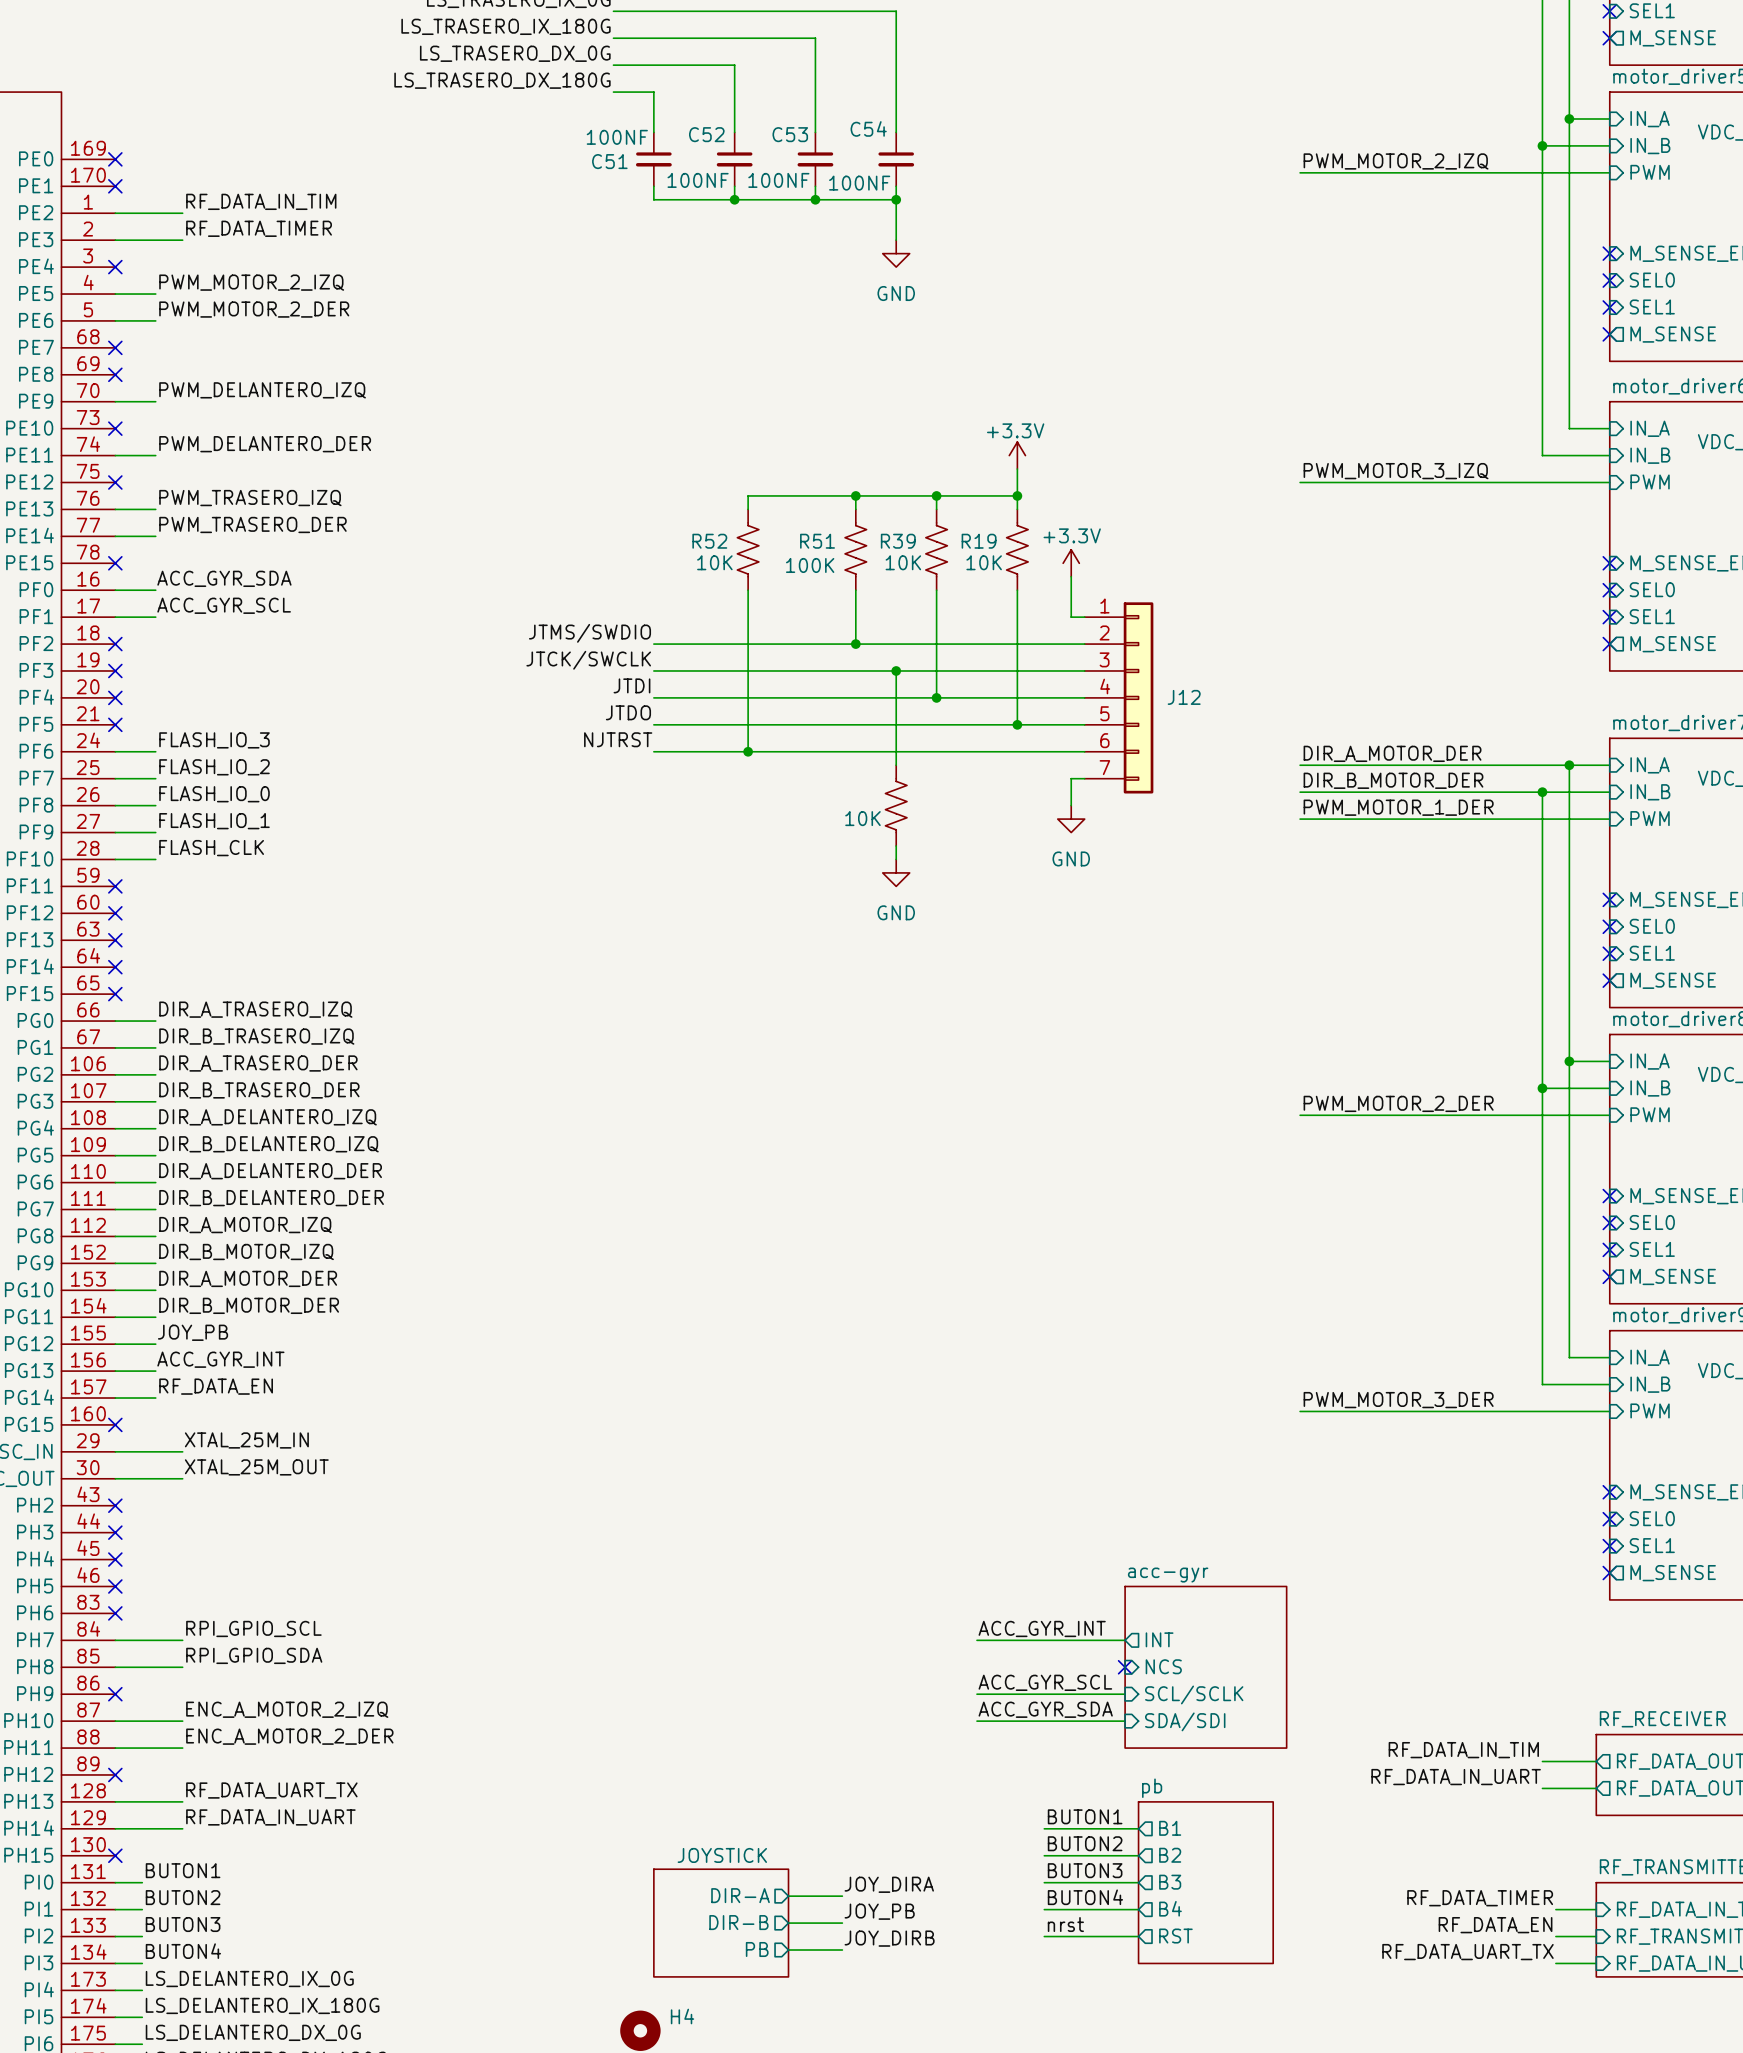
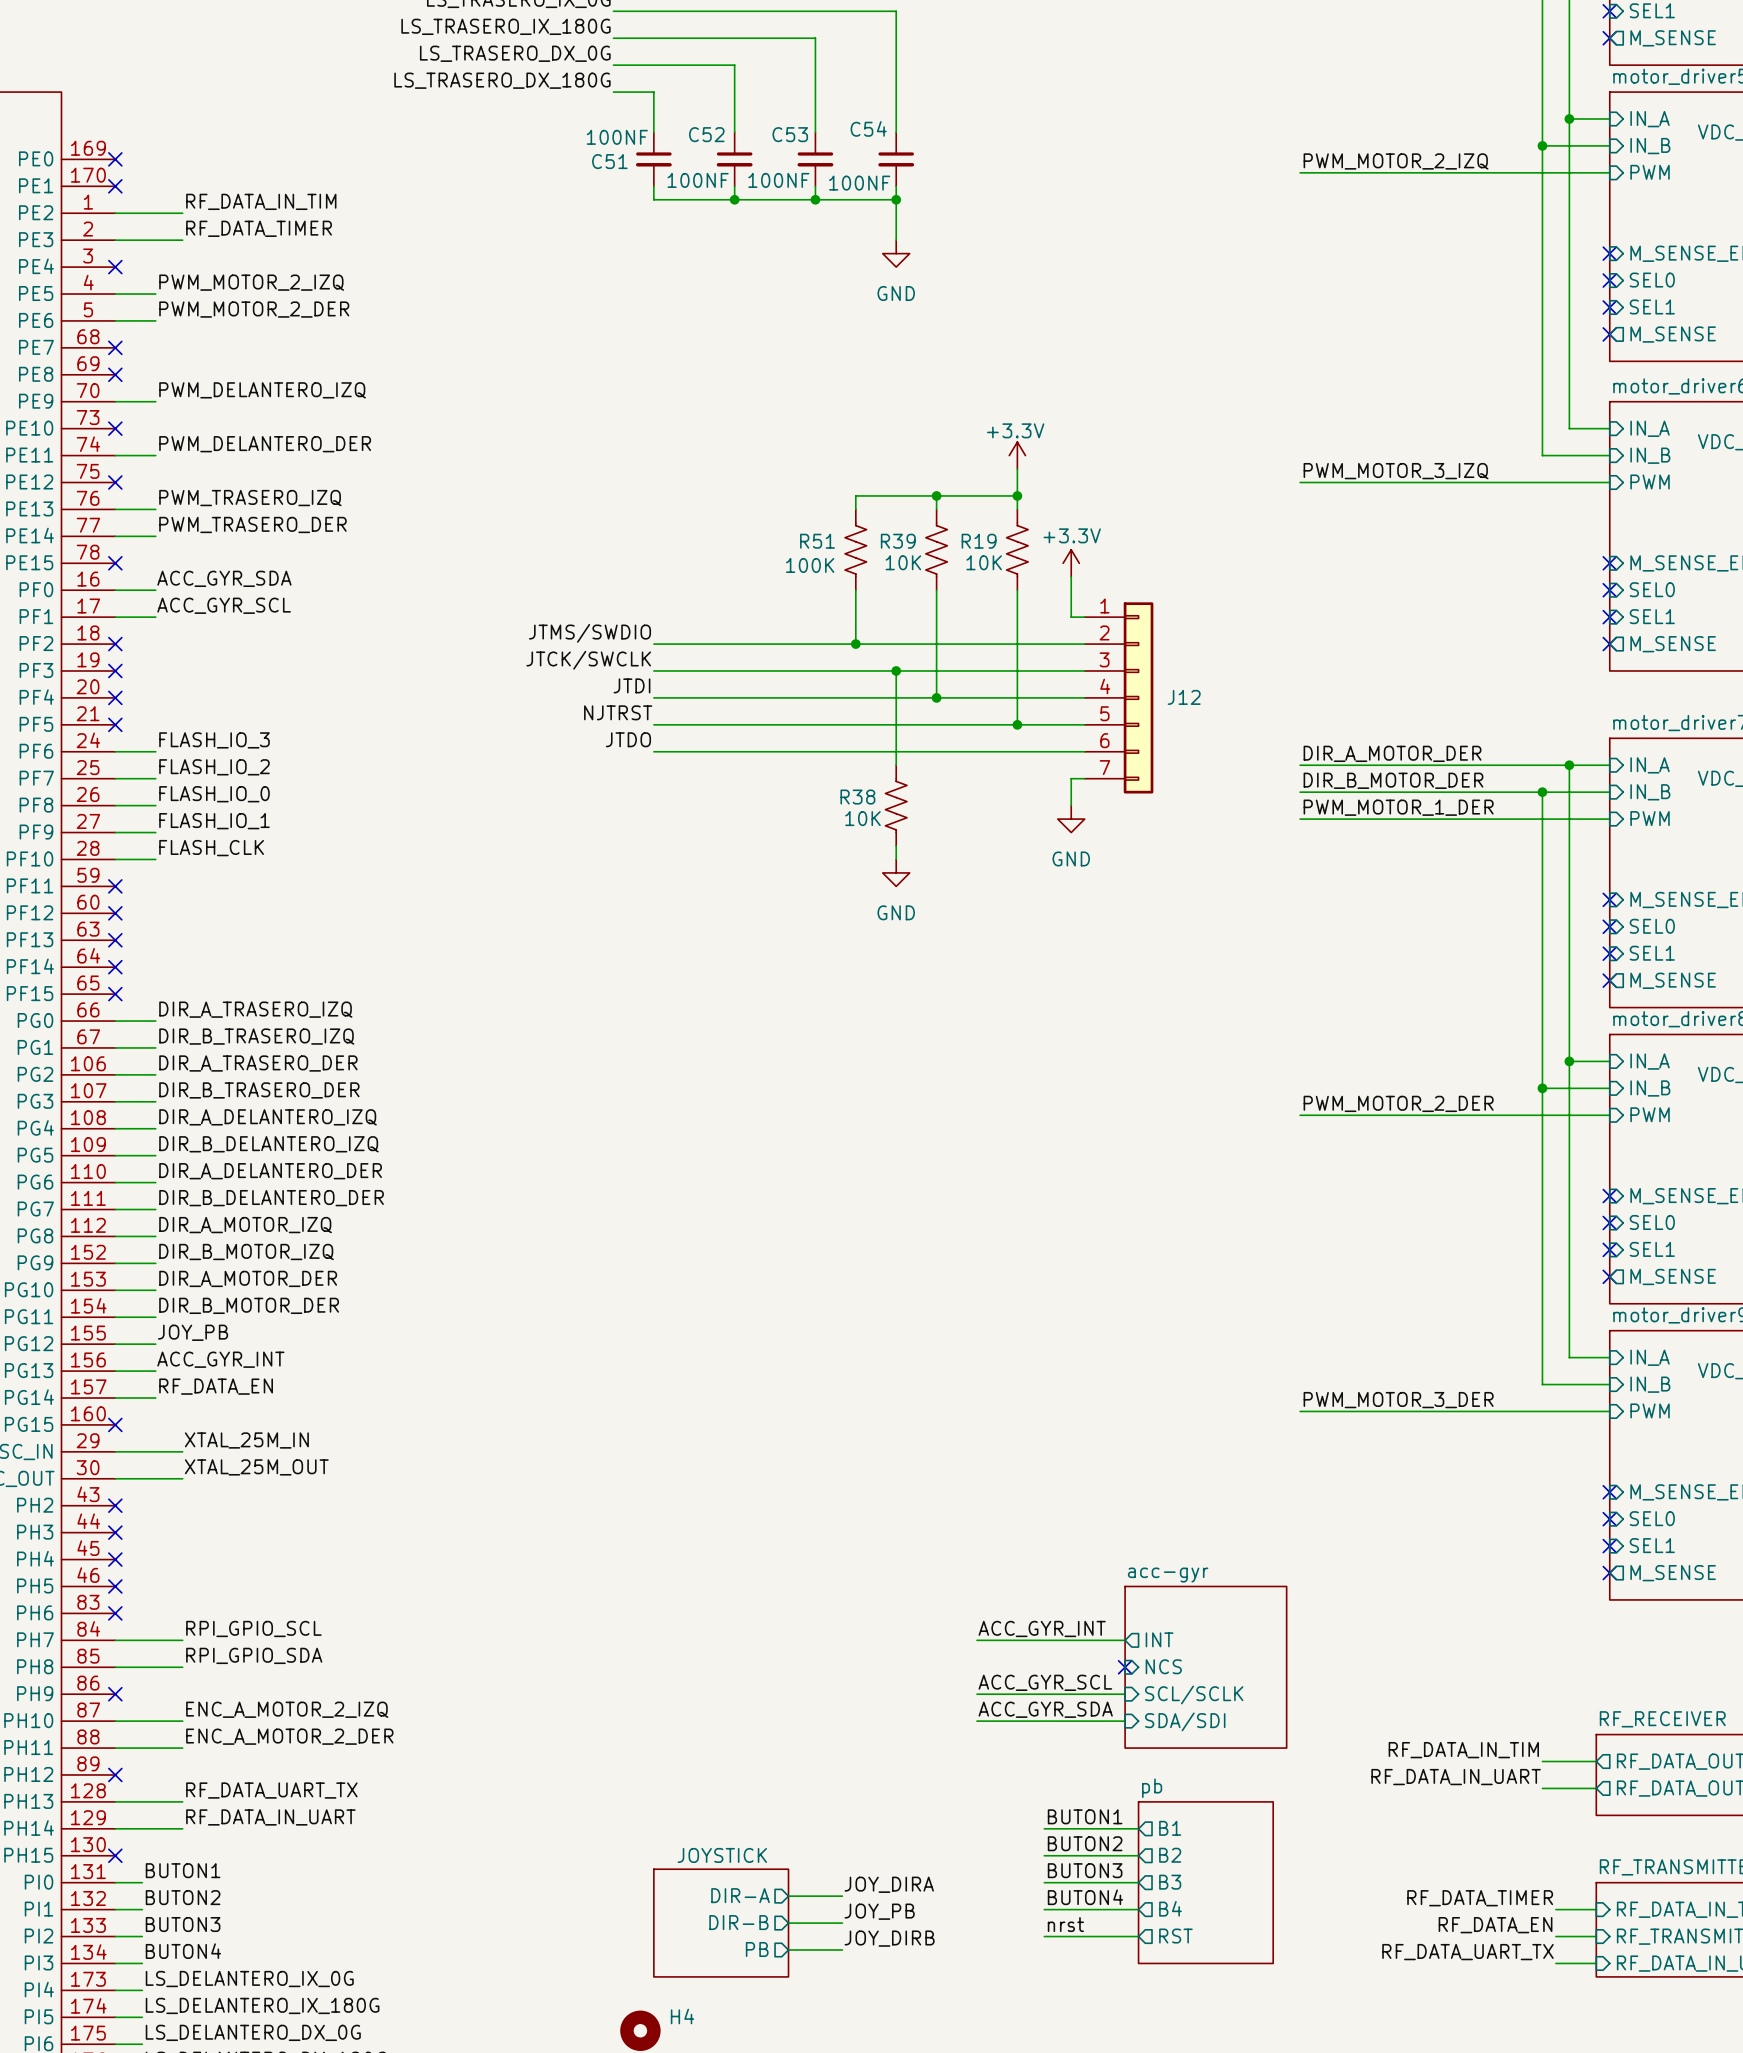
wire: (855, 495) (748, 495) (748, 509) -> none
junction: (855, 495) -> none
R52: 10K (748, 549) -> none
wire: (748, 590) (748, 751) -> none
label: JTDO (628, 712) -> NJTRST (618, 712)
label: NJTRST (618, 739) -> JTDO (628, 739)
junction: (748, 751) -> none
R38 name: none -> R38 (857, 797)

